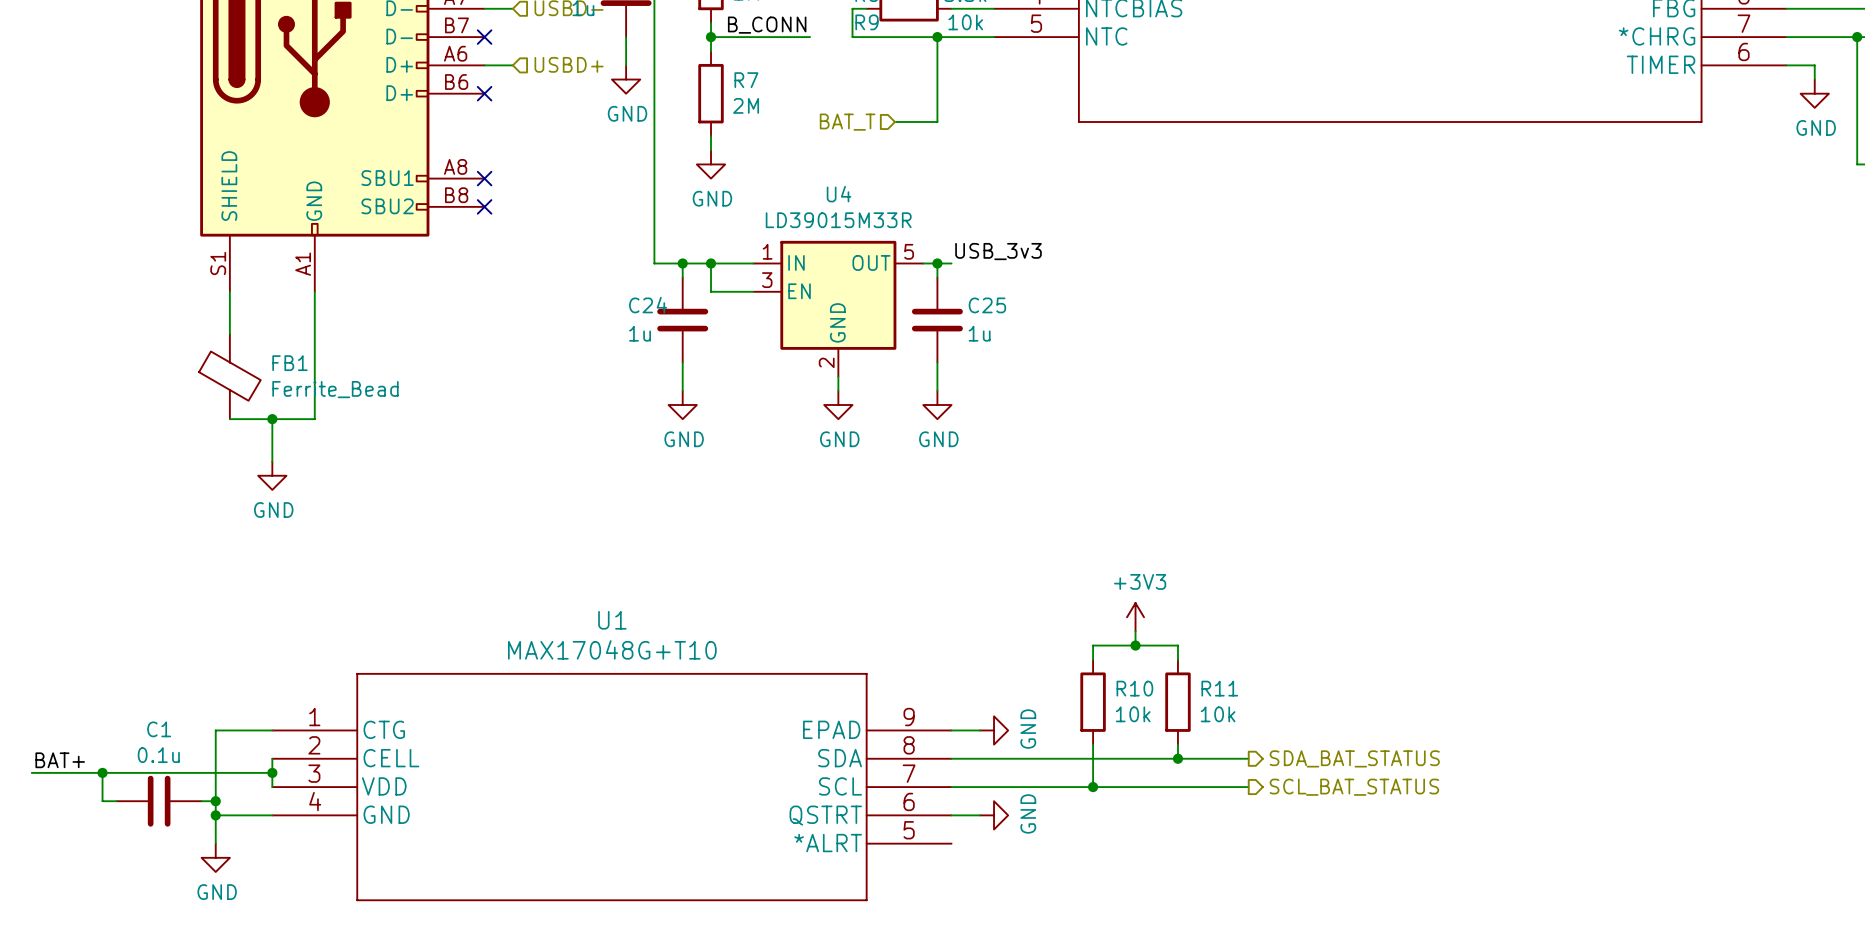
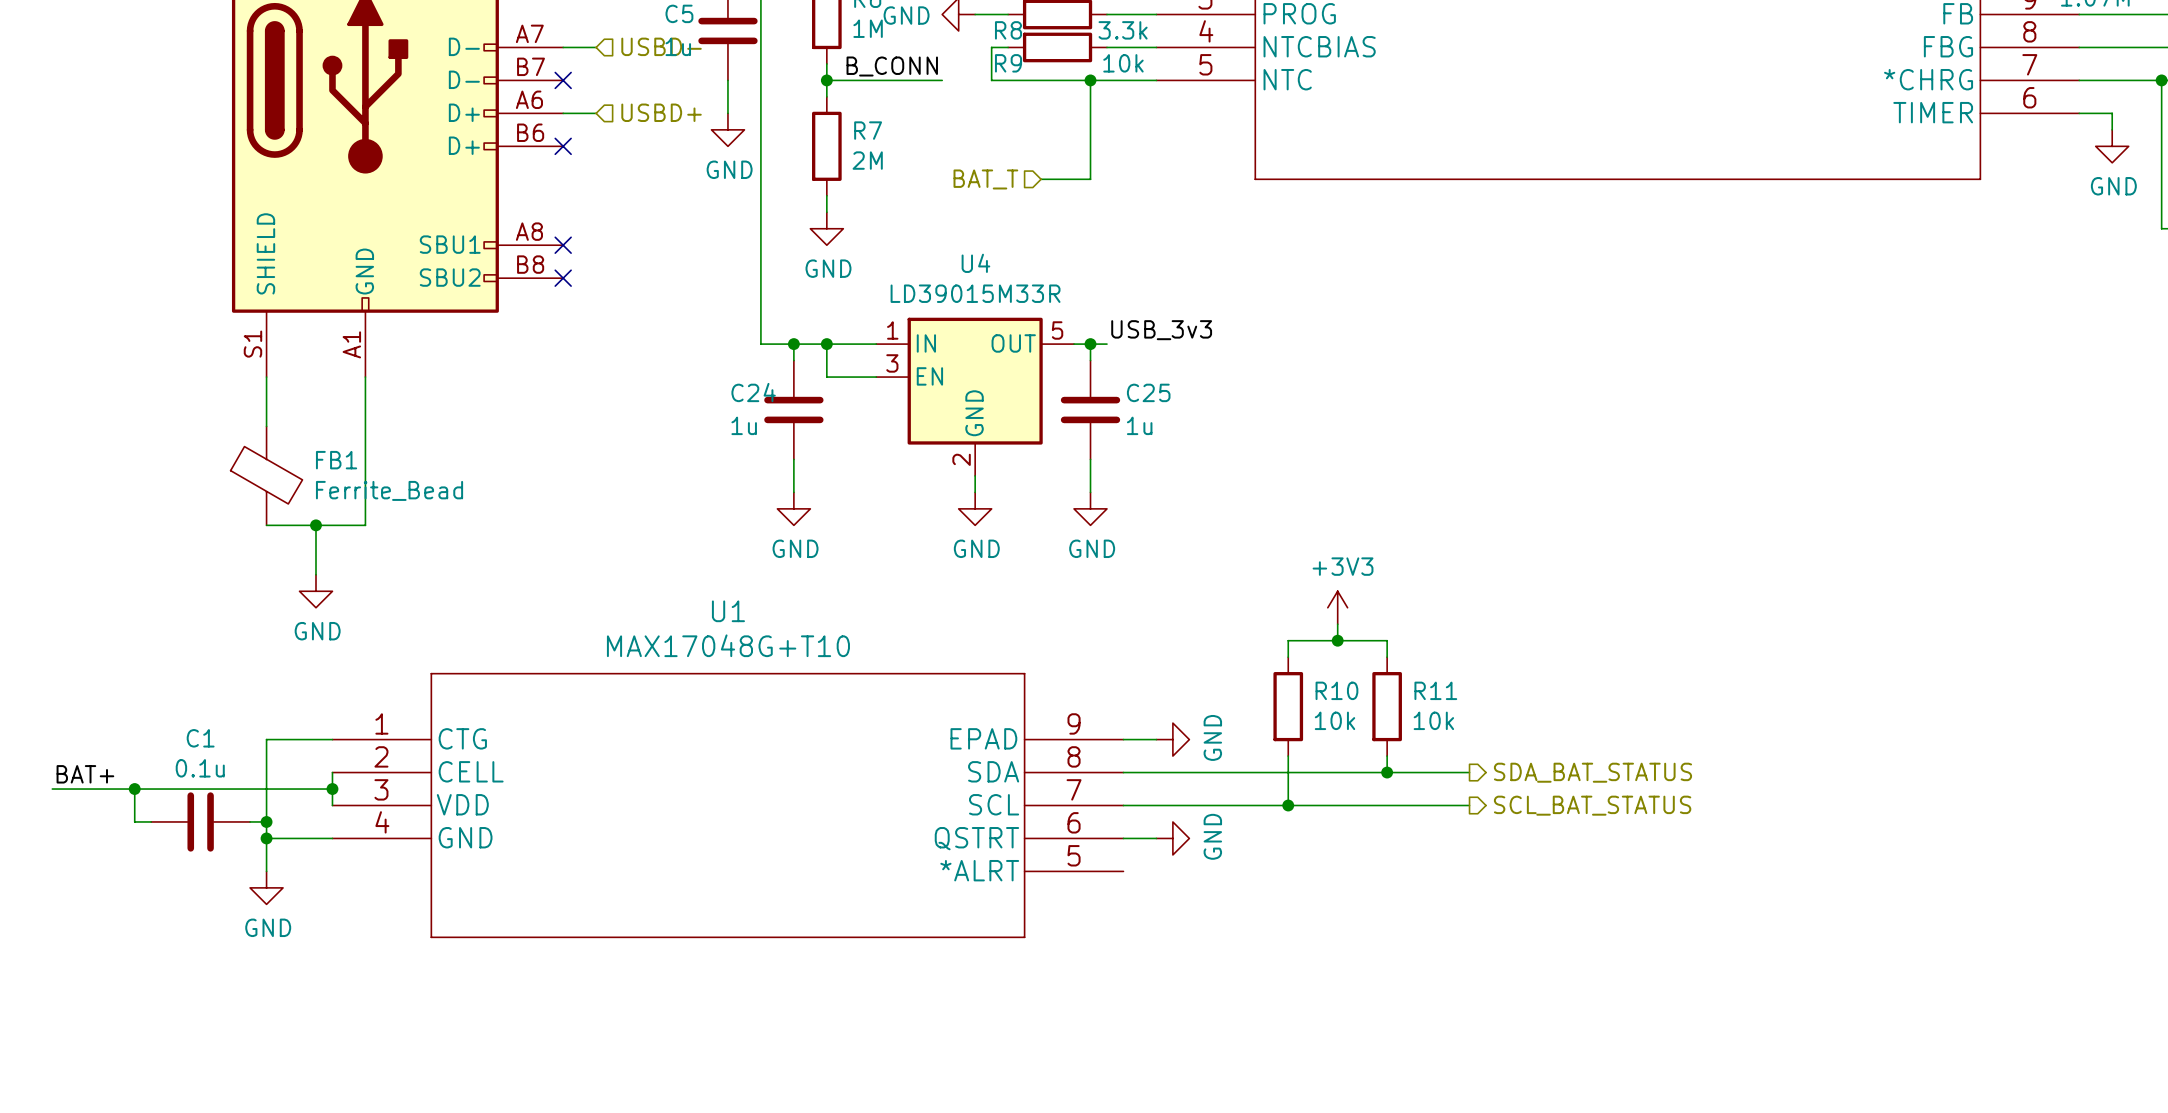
junction: none -> (1337, 640)
power symbol: none -> GND (1172, 739)
power symbol position: +3V3 (1135, 617) -> +3V3 (1337, 607)
wire: (1135, 631) (1135, 645) -> (1337, 624) (1337, 640)
junction: none -> (1387, 772)
junction: none -> (134, 789)
junction: none -> (332, 789)
junction: (1135, 645) -> none
wire: (1093, 659) (1093, 645) (1177, 645) (1177, 659) -> (1288, 657) (1288, 640) (1387, 640) (1387, 657)
junction: none -> (1288, 805)
junction: none -> (266, 821)
junction: none -> (266, 838)
R10 position: (1093, 702) -> (1288, 706)
R11 position: (1177, 702) -> (1387, 706)
wire: (272, 730) (215, 730) (215, 843) -> (332, 739) (266, 739) (266, 871)
wire: (951, 730) (979, 730) -> (1123, 739) (1156, 739)
power symbol position: GND (994, 730) -> GND (1172, 838)
wire: (1093, 744) (1093, 787) -> (1288, 756) (1288, 805)
wire: (1177, 744) (1177, 758) -> (1387, 756) (1387, 772)
wire: (272, 758) (272, 787) -> (332, 772) (332, 805)
wire: (951, 758) (1248, 758) -> (1123, 772) (1469, 772)
junction: (1177, 758) -> none
hierarchical label position: SDA_BAT_STATUS (1354, 758) -> SDA_BAT_STATUS (1592, 772)
label position: BAT+ (60, 760) -> BAT+ (85, 774)
wire: (31, 772) (272, 772) -> (52, 789) (332, 789)
wire: (102, 772) (102, 801) (116, 801) -> (134, 789) (134, 821) (151, 821)
junction: (102, 772) -> none
junction: (272, 772) -> none
U1 position: (611, 787) -> (727, 805)
wire: (951, 787) (1248, 787) -> (1123, 805) (1469, 805)
junction: (1093, 787) -> none
hierarchical label position: SCL_BAT_STATUS (1354, 787) -> SCL_BAT_STATUS (1592, 805)
C1 position: (159, 801) -> (200, 821)
wire: (201, 801) (215, 801) -> (250, 821) (266, 821)
junction: (215, 801) -> none
wire: (215, 815) (272, 815) -> (266, 838) (332, 838)
junction: (215, 815) -> none
wire: (951, 815) (979, 815) -> (1123, 838) (1156, 838)
power symbol: GND (994, 815) -> none
power symbol position: GND (215, 857) -> GND (266, 887)

